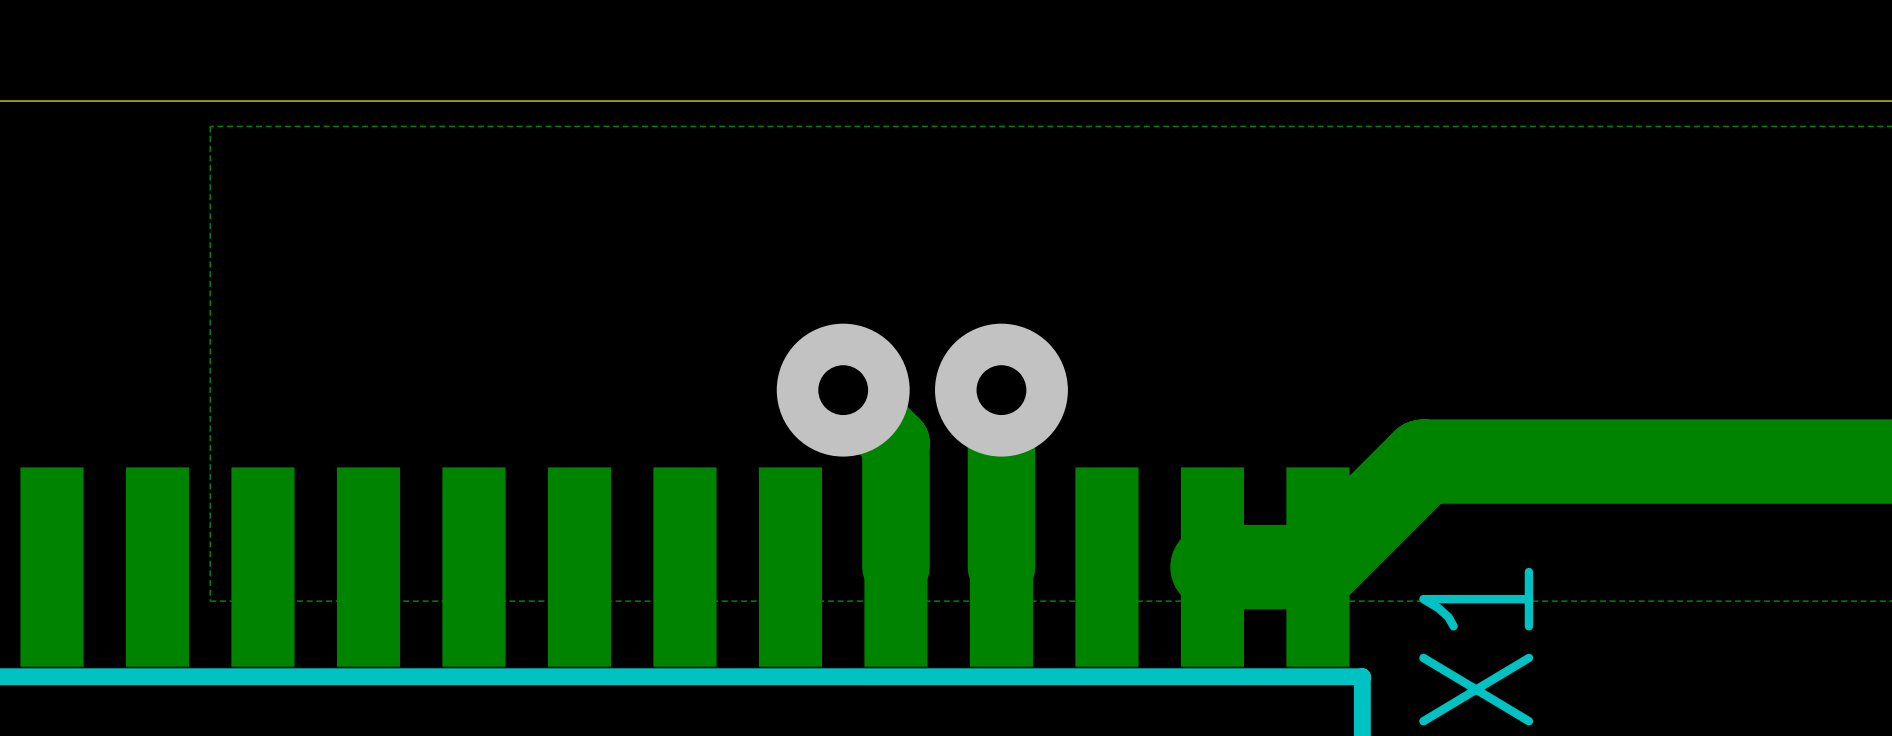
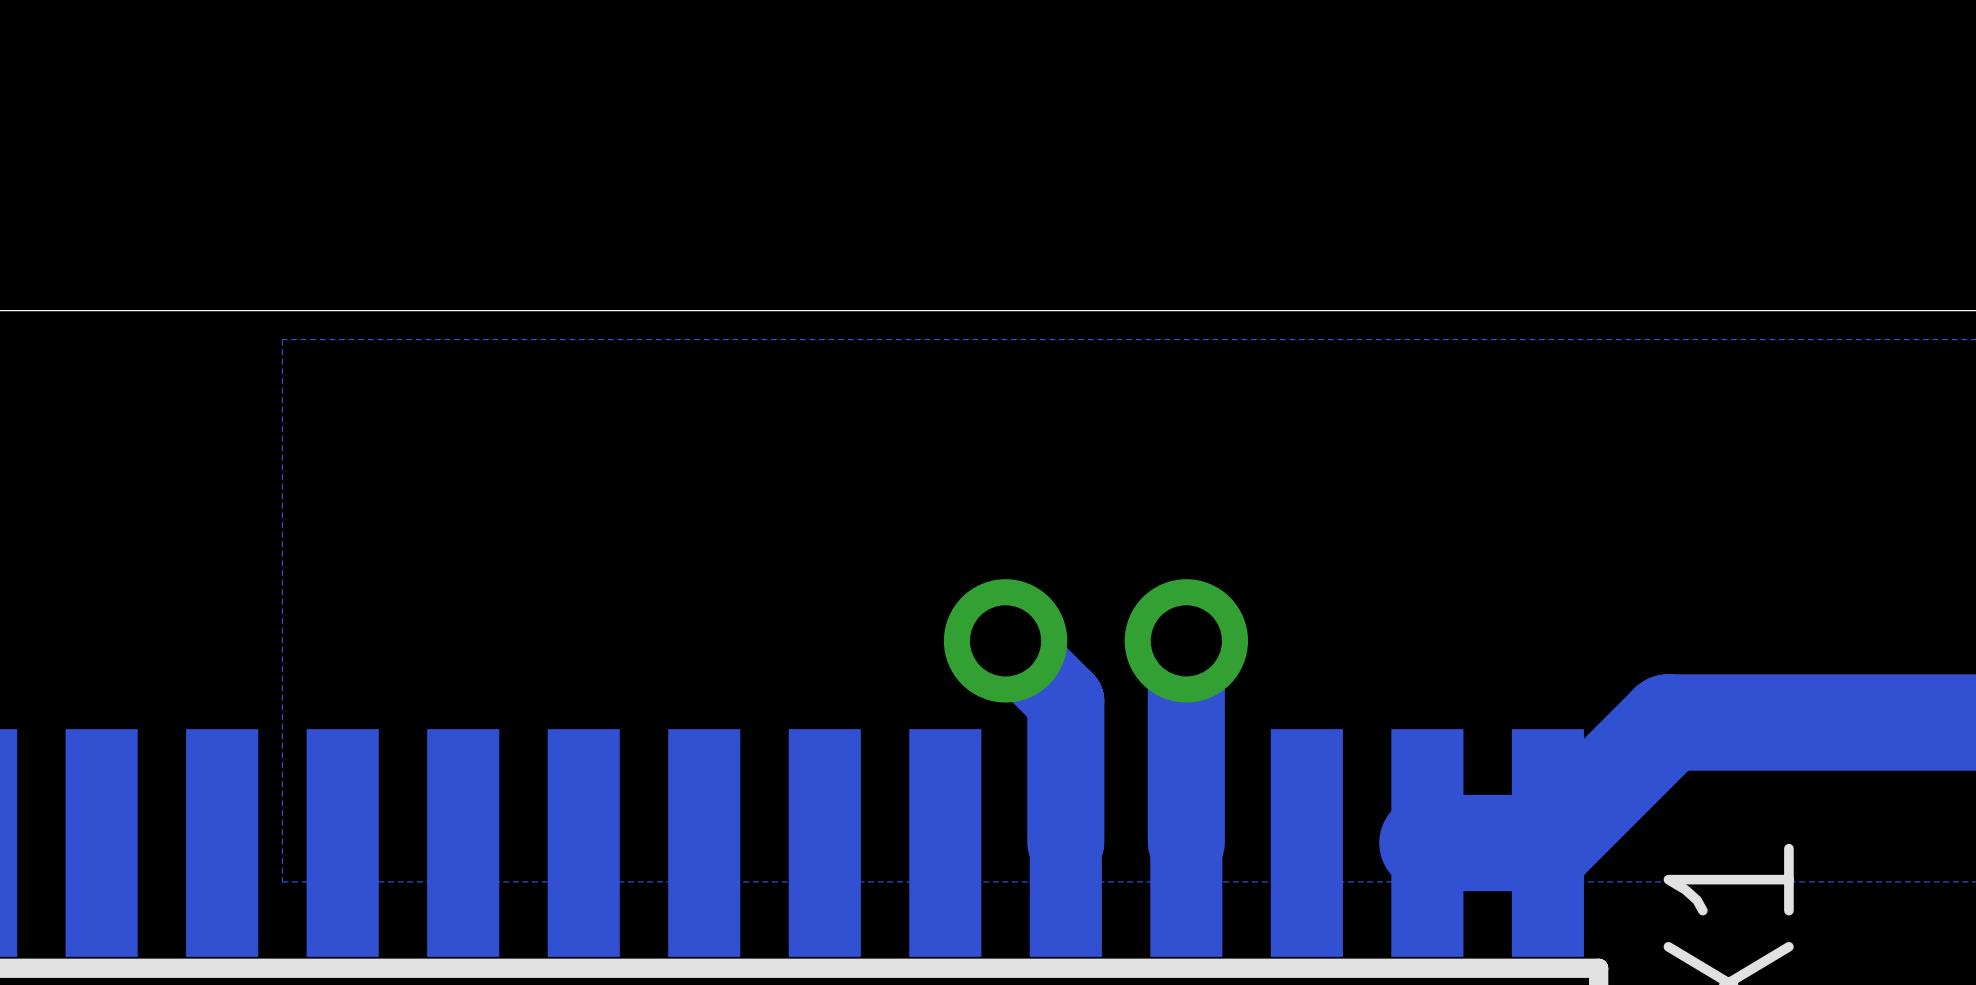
via size: [776, 323, 910, 457] -> [943, 579, 1068, 703]
via size: [935, 323, 1068, 457] -> [1124, 579, 1249, 703]

